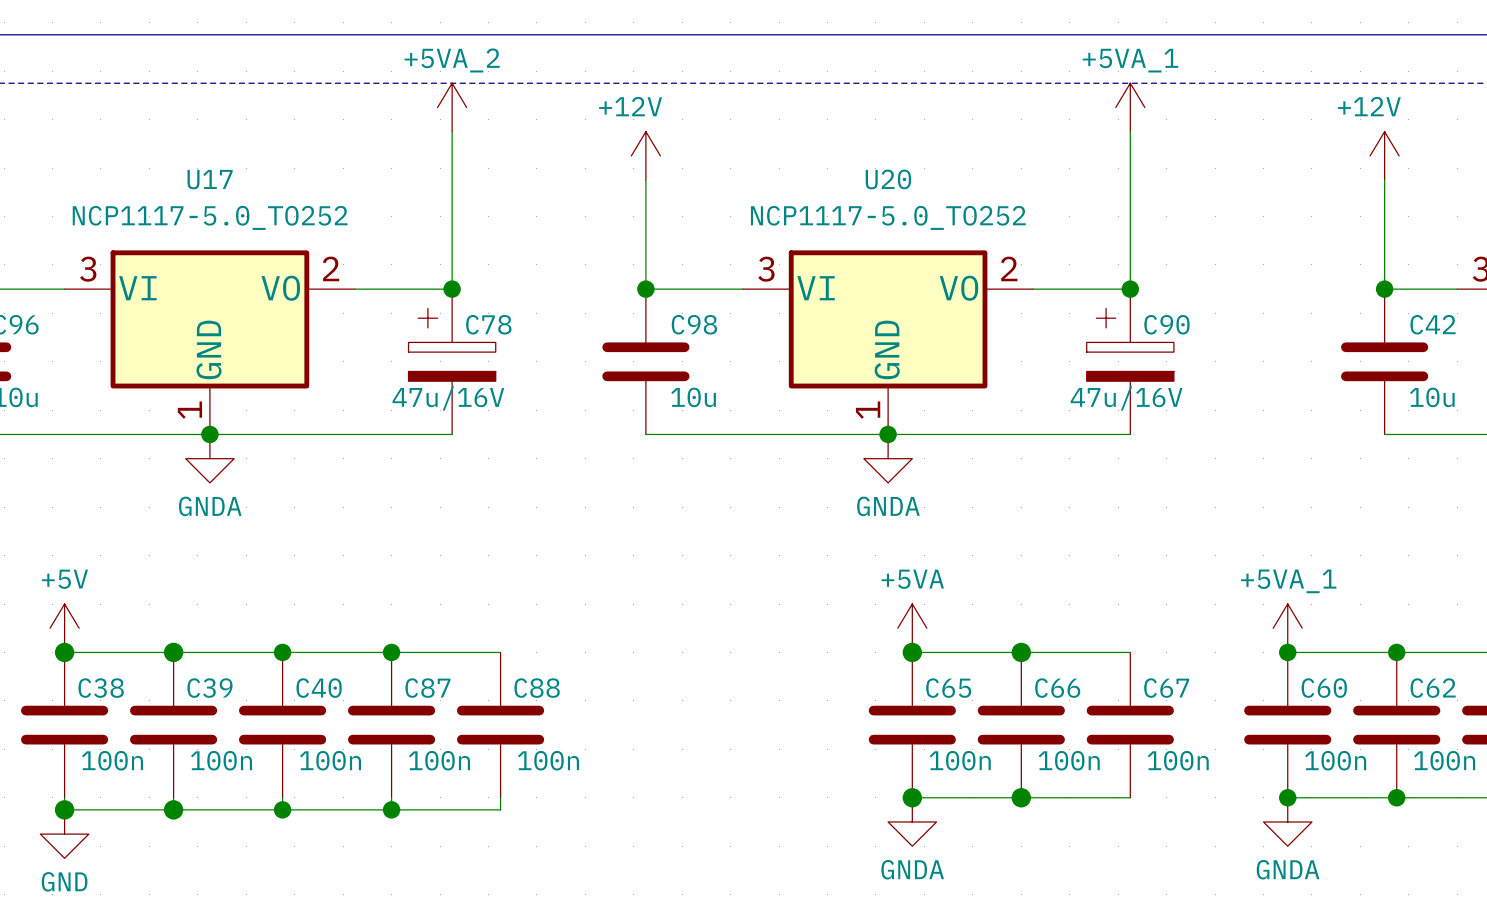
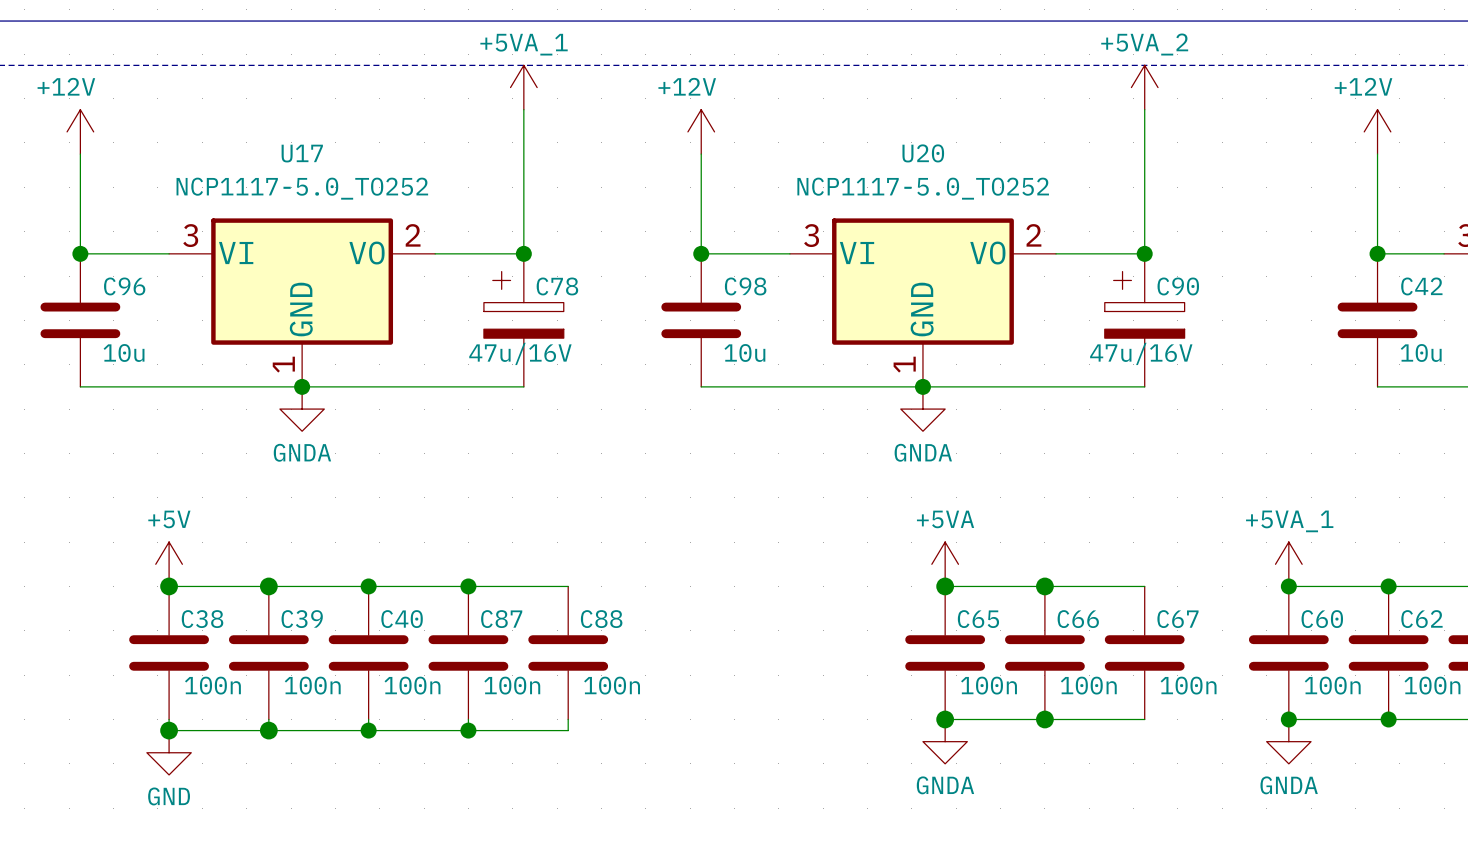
power symbol: +5VA_2 (452, 107) -> +5VA_1 (523, 87)
power symbol: +5VA_1 (1130, 107) -> +5VA_2 (1144, 87)

